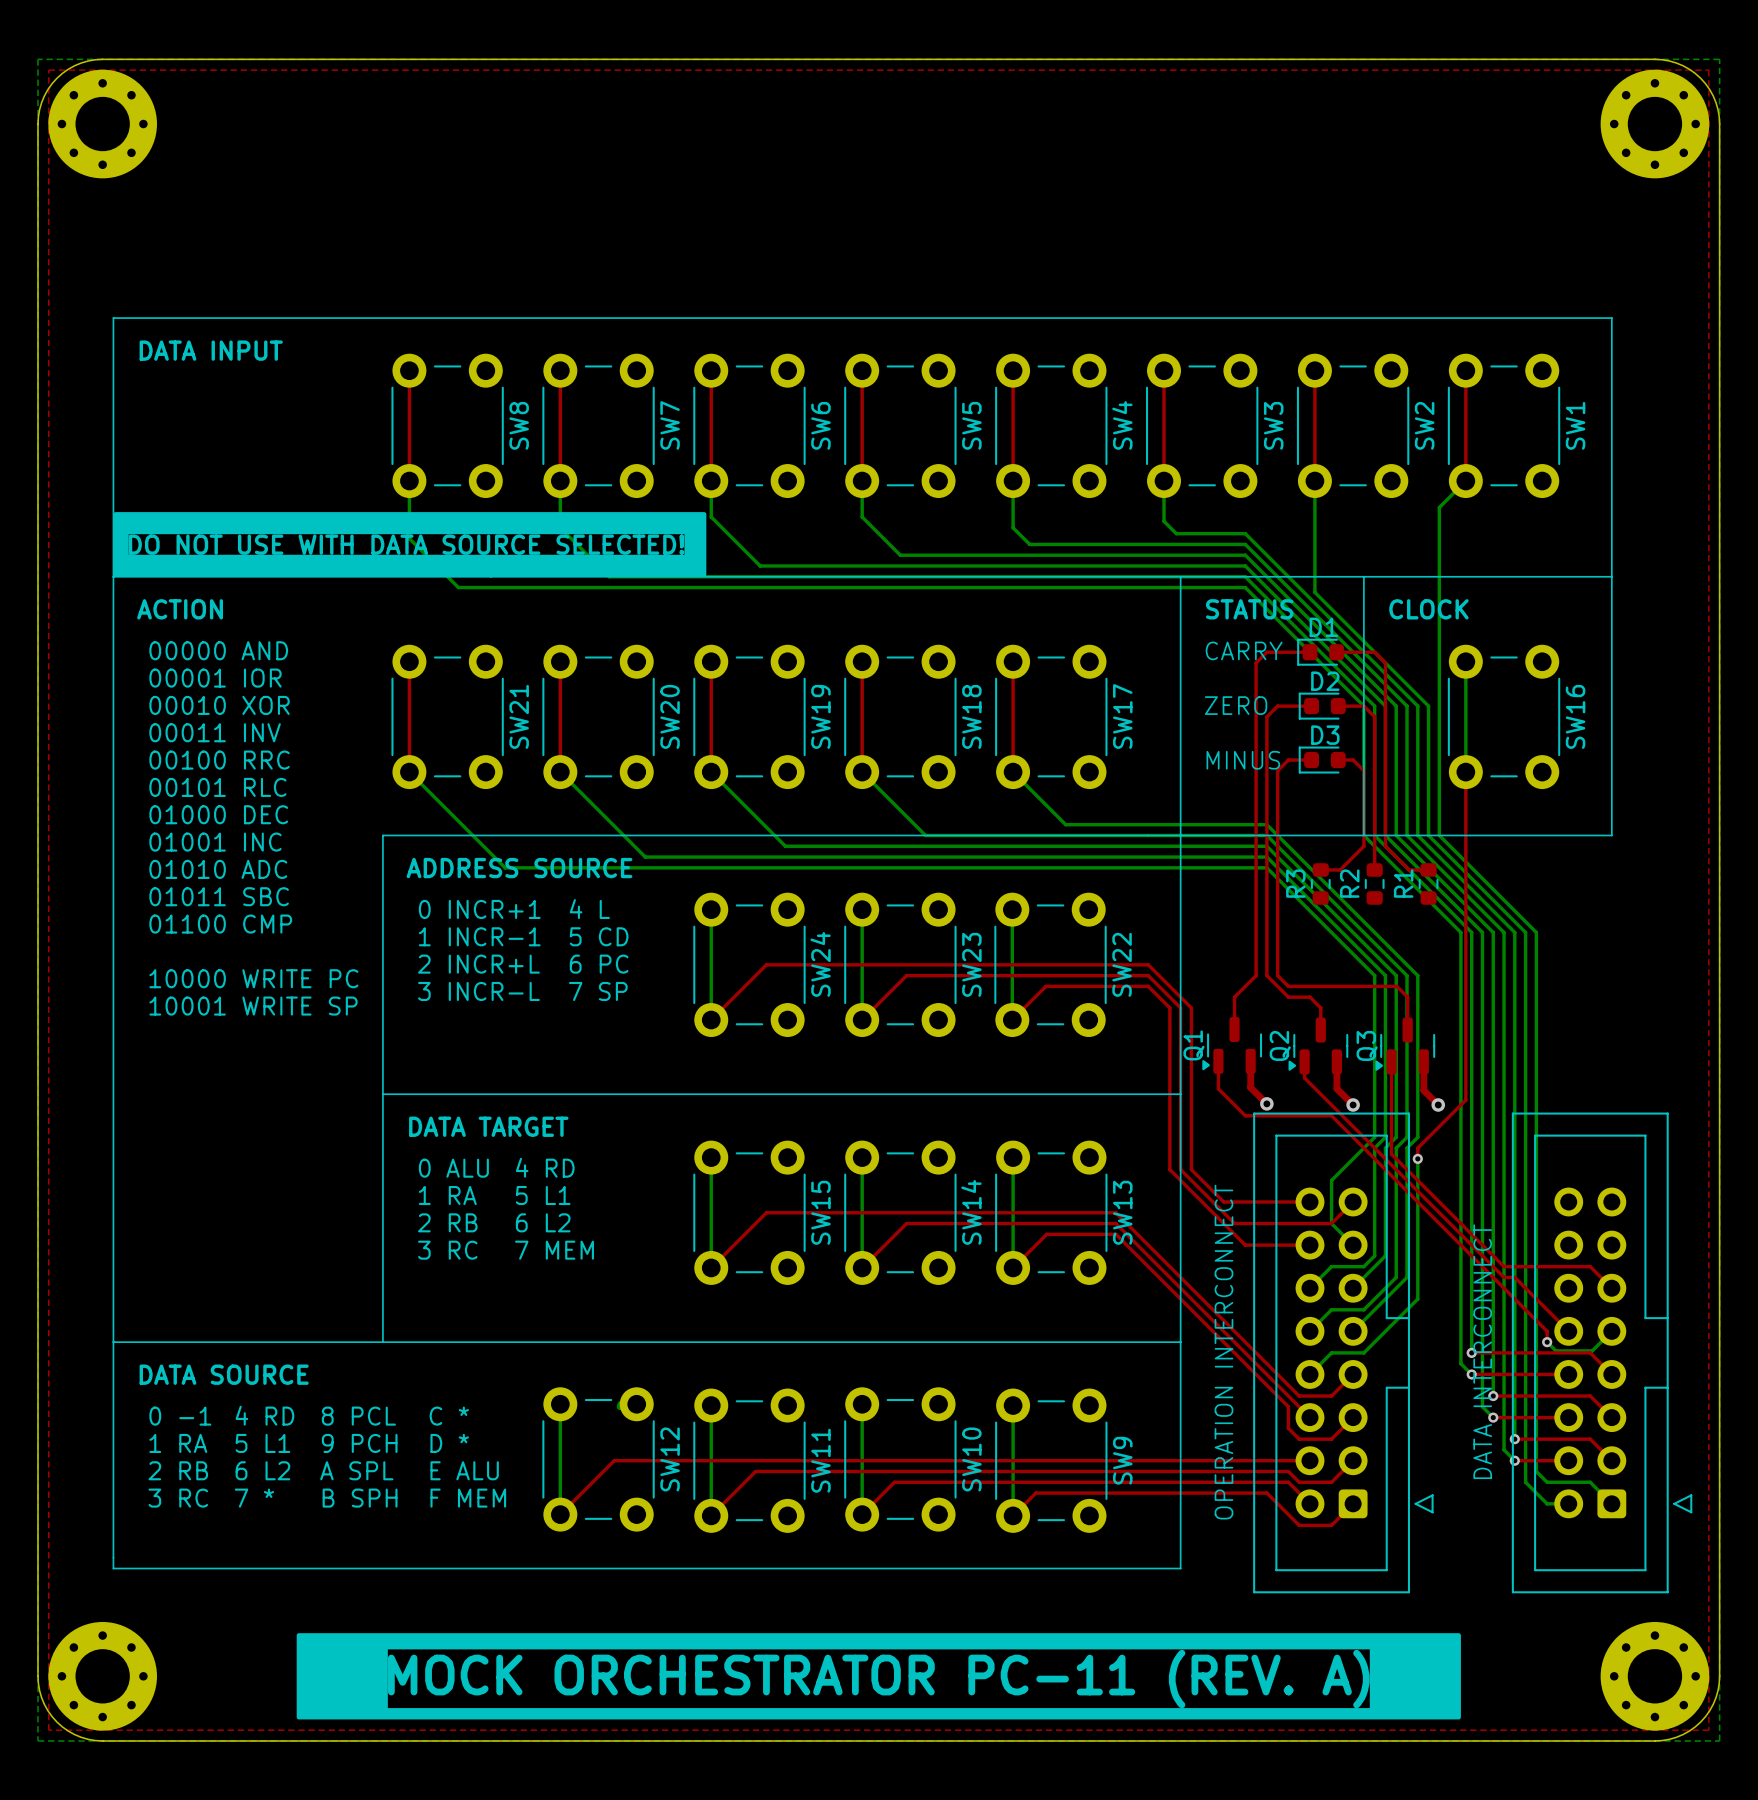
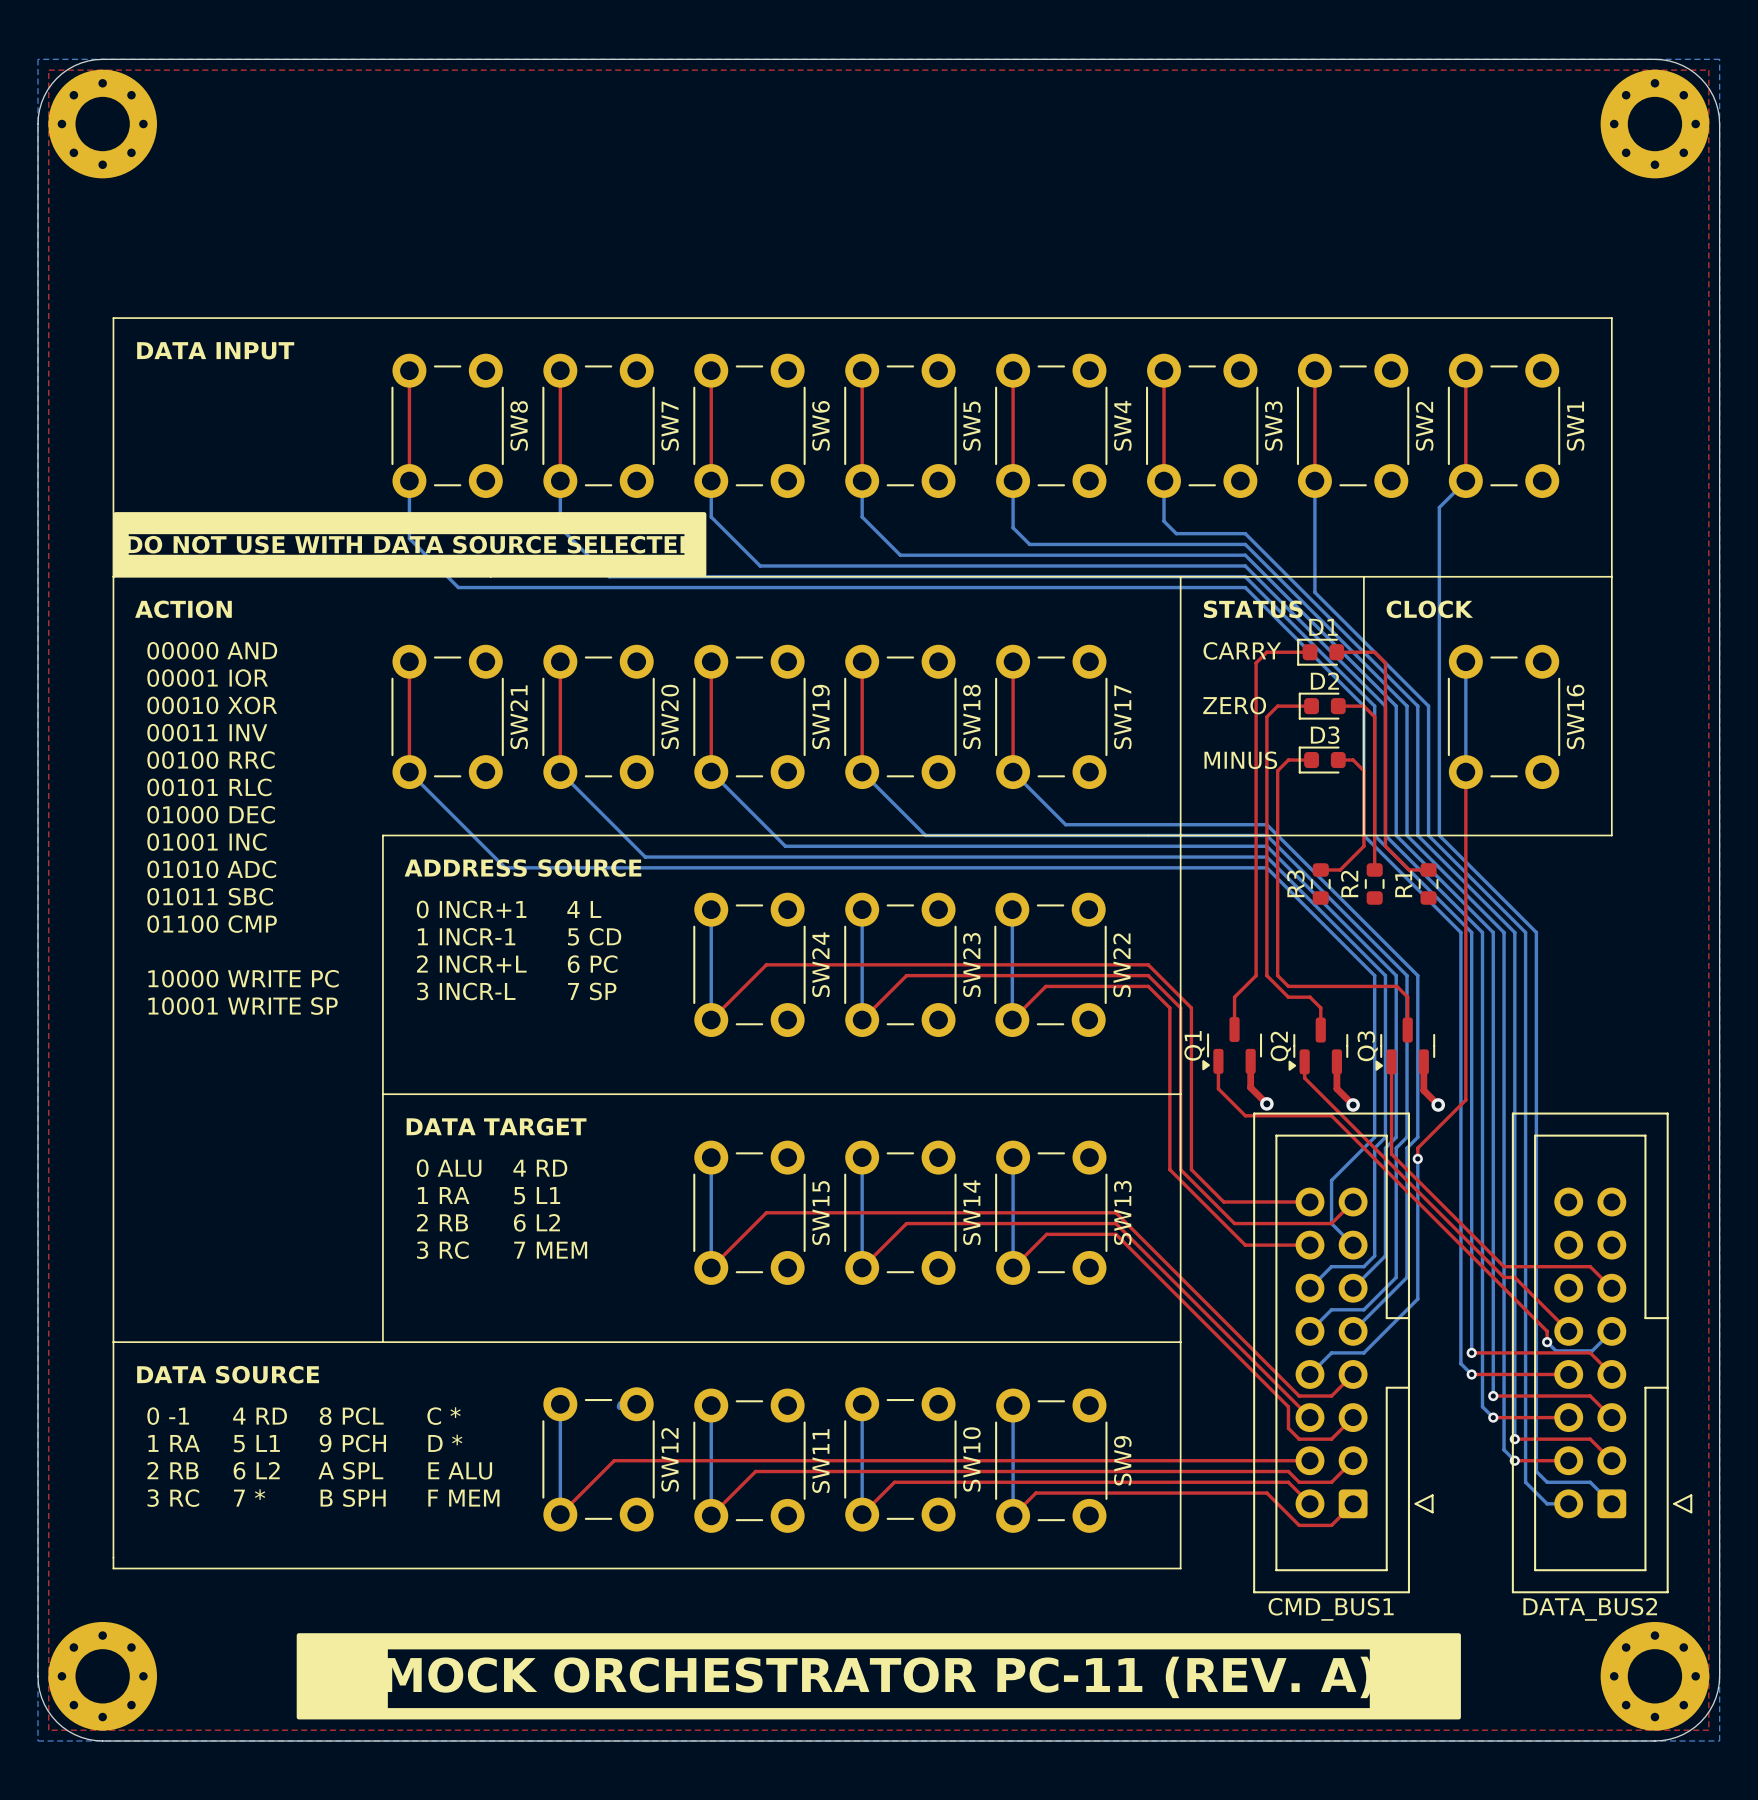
text: DATA INTERCONNECT (1482, 1351) -> none
text: OPERATION INTERCONNECT (1223, 1352) -> none
CMD_BUS1 name: none -> CMD_BUS1 (1331, 1609)
DATA_BUS2 name: none -> DATA_BUS2 (1590, 1609)

